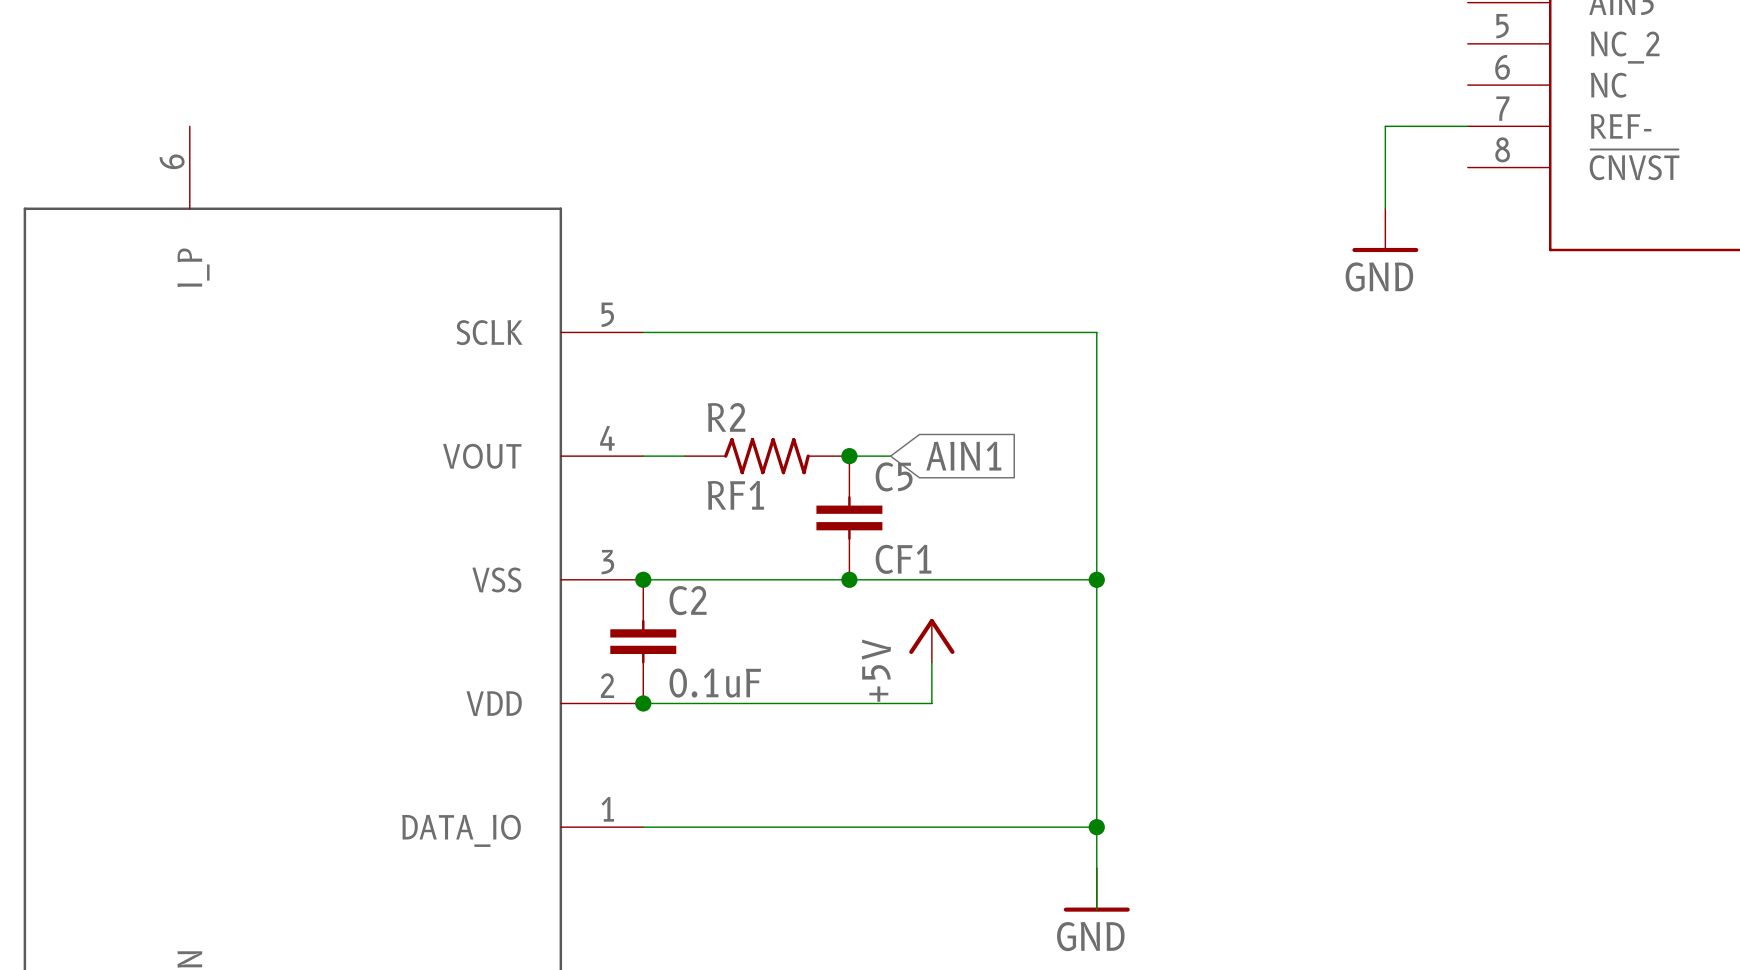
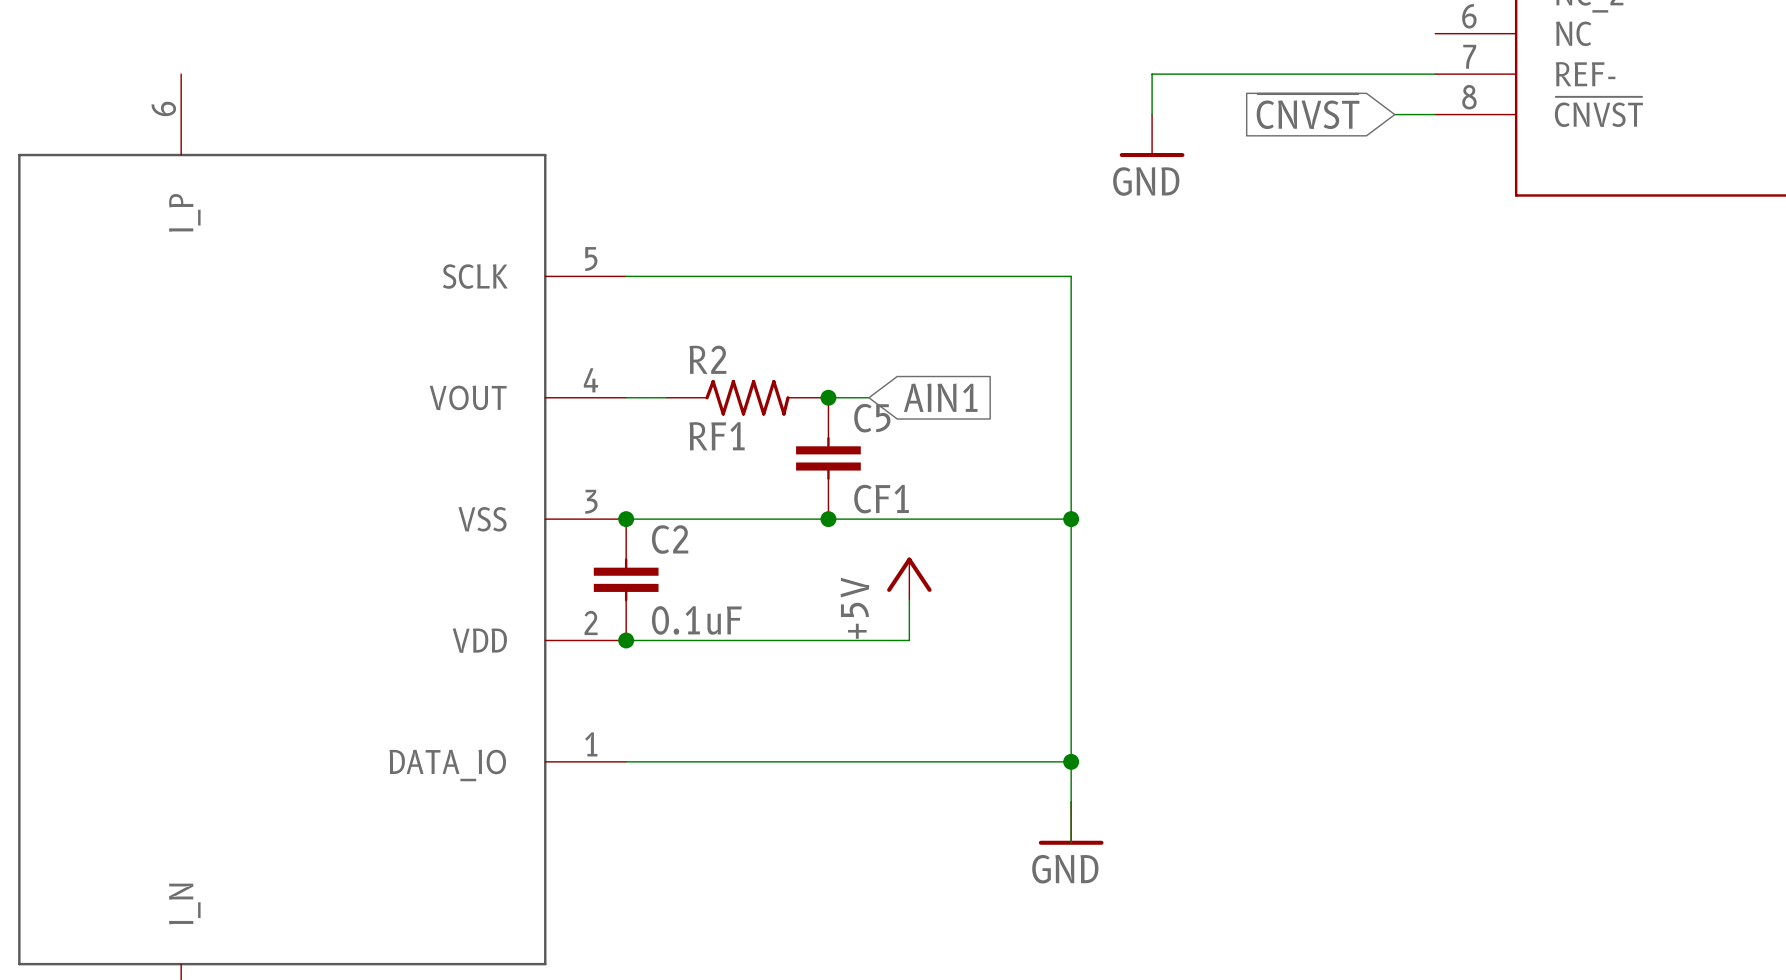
wire: (1385, 126) (1385, 208) -> (1354, 74) (1152, 74) (1152, 114)
global label: none -> ~{CNVST} (1308, 111)
wire: none -> (1394, 114) (1435, 114)
power symbol position: GND (1385, 230) -> GND (1152, 135)

